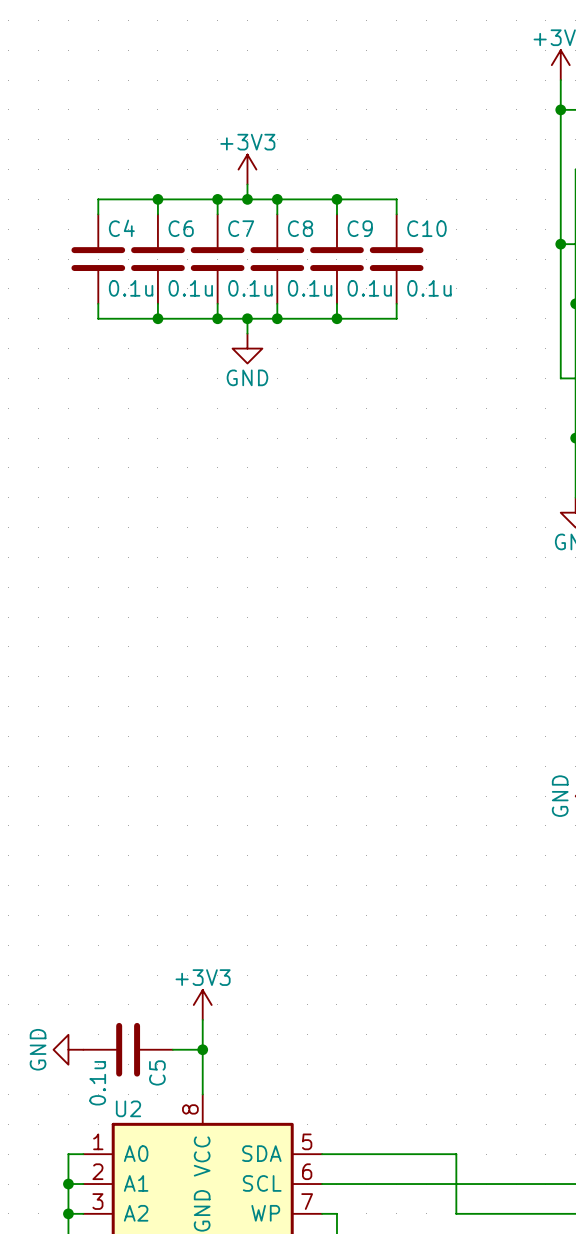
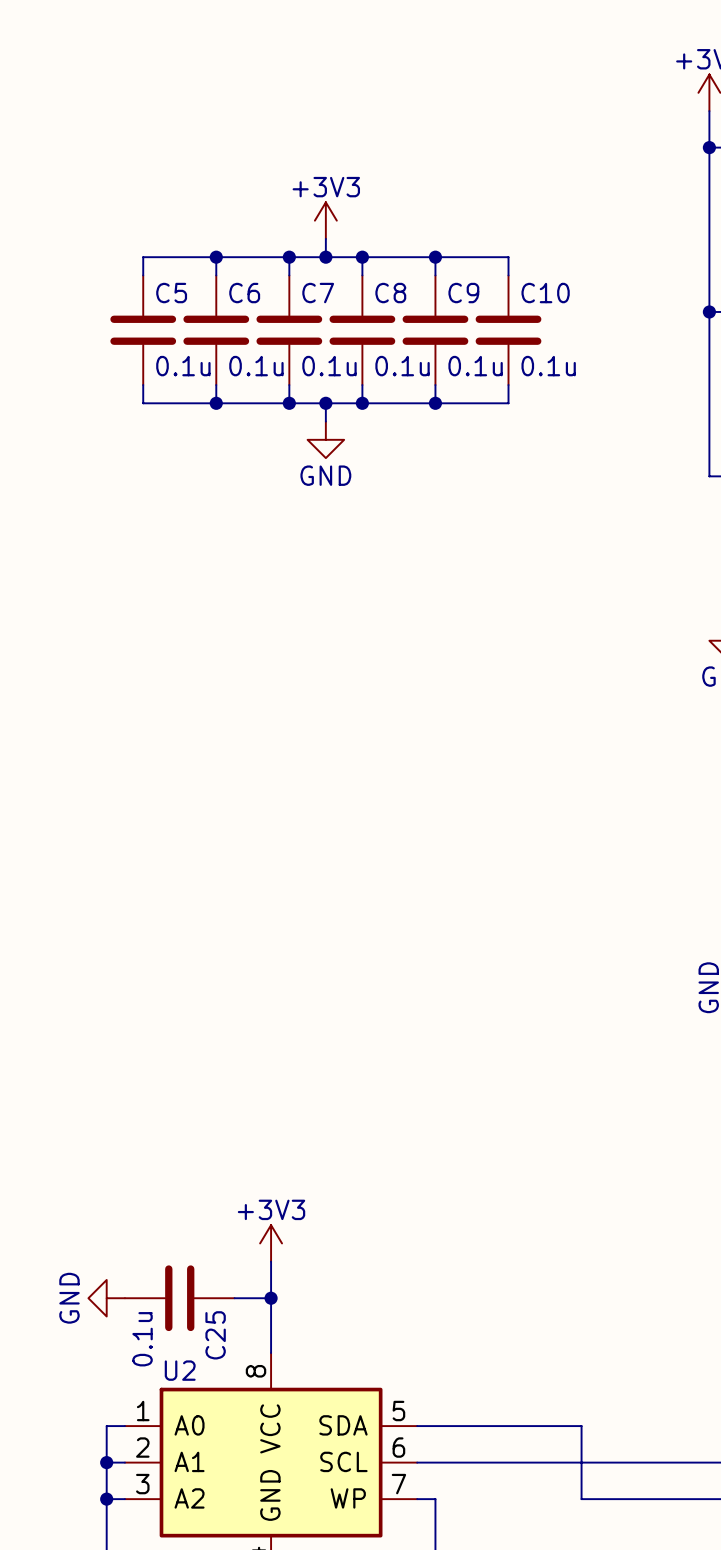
C4 name: C4 (121, 228) -> C5 (171, 293)
C5 name: C5 (157, 1072) -> C25 (215, 1335)

